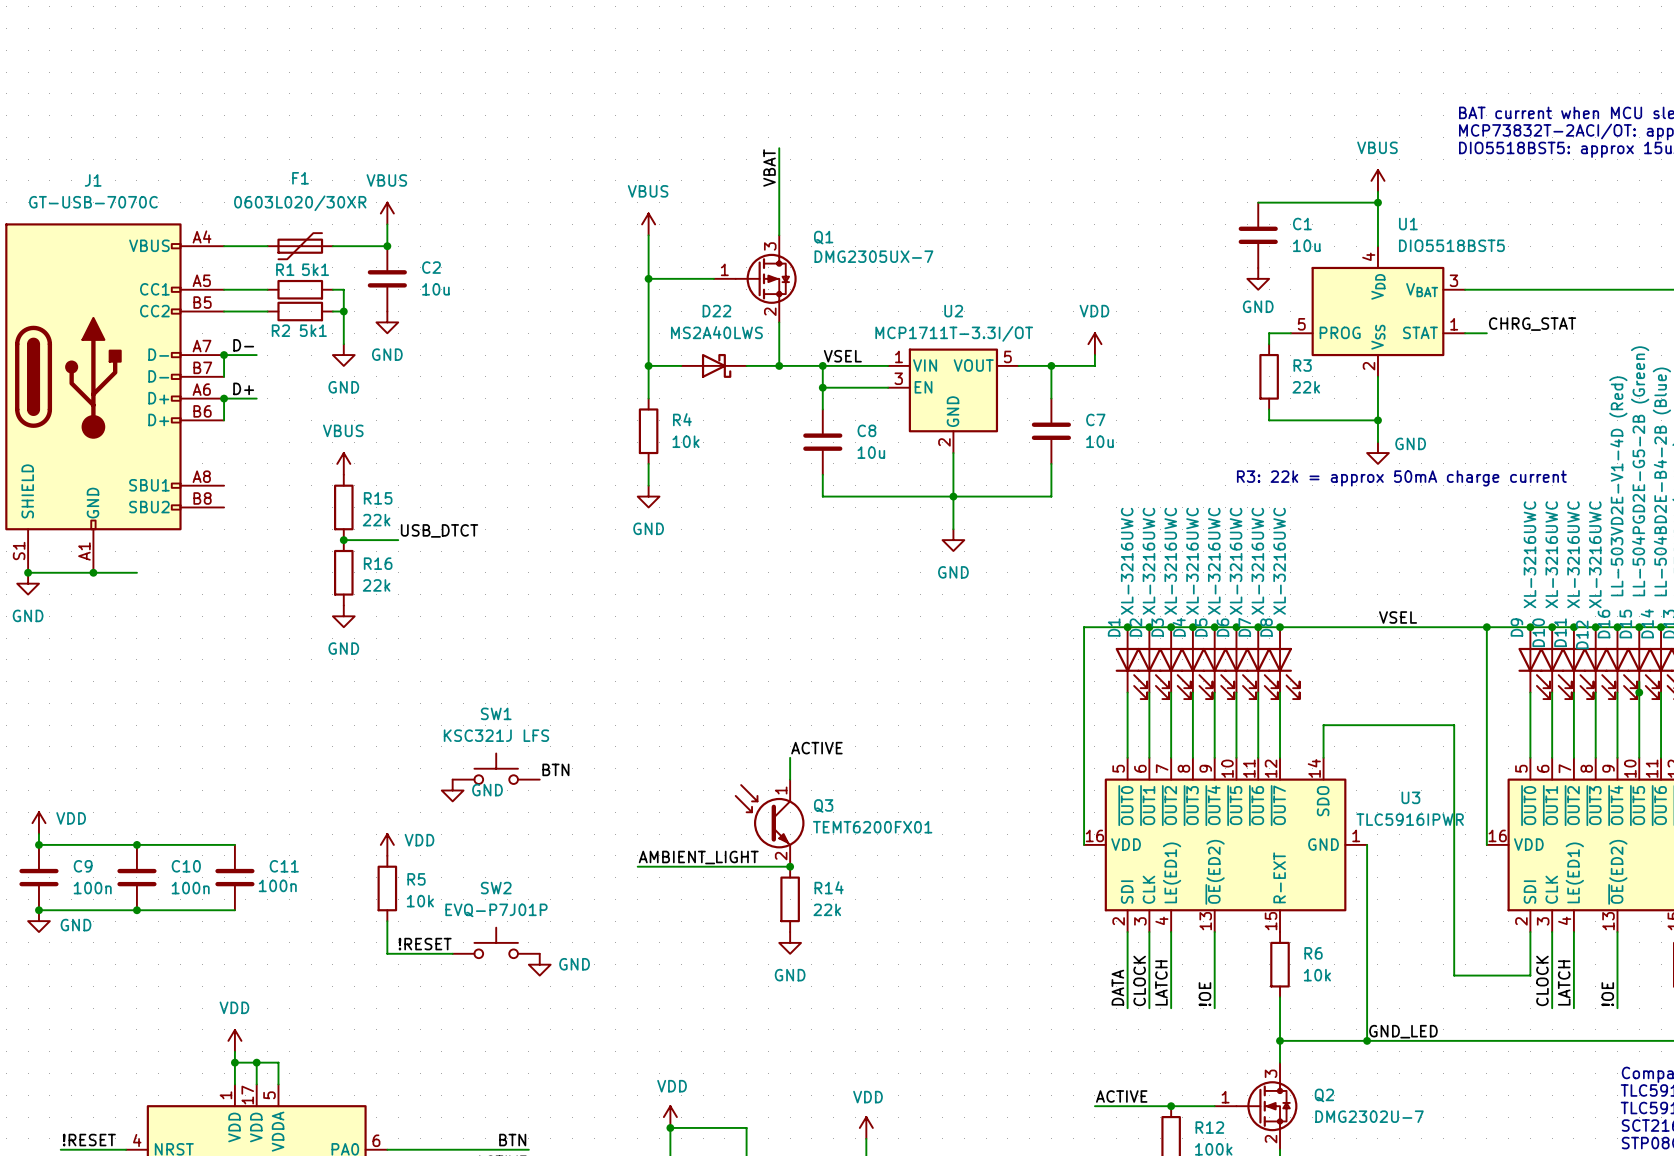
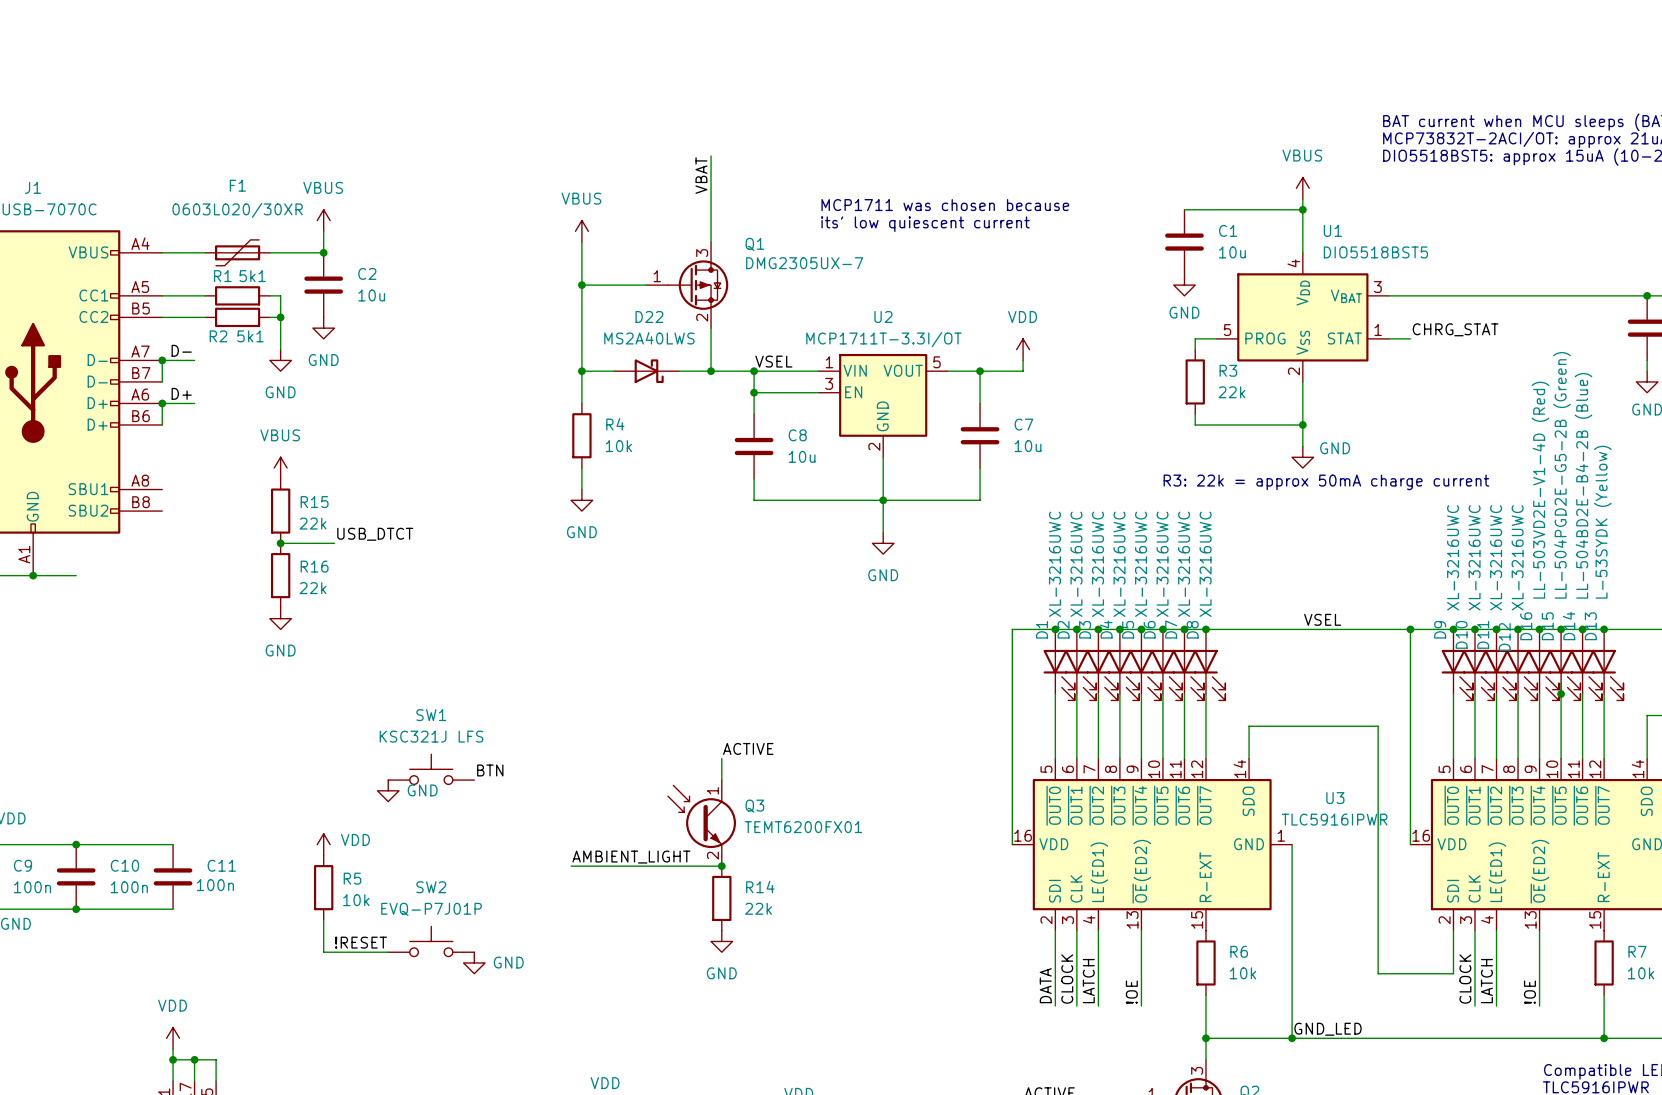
text: none -> MCP1711 was chosen because (945, 205)
text: none -> its' low quiescent current (925, 224)

